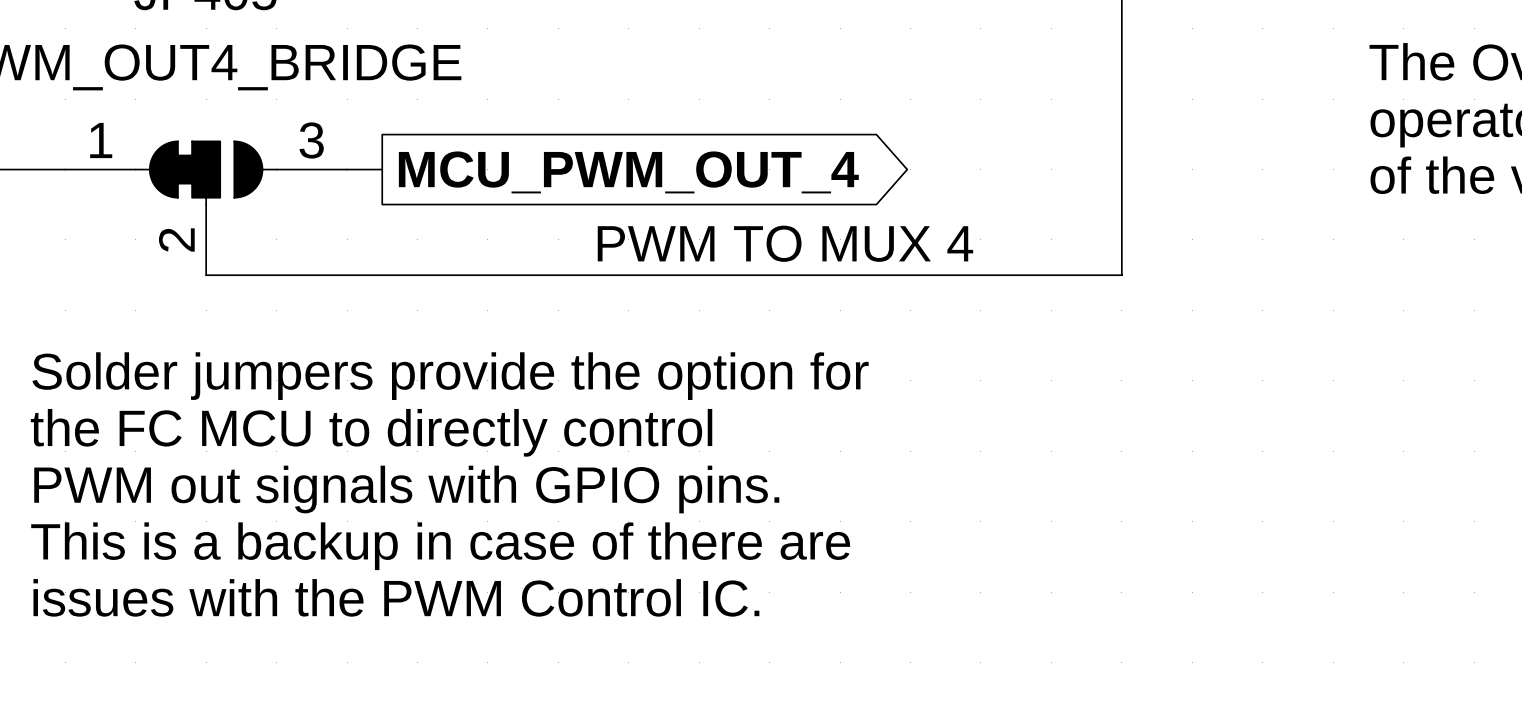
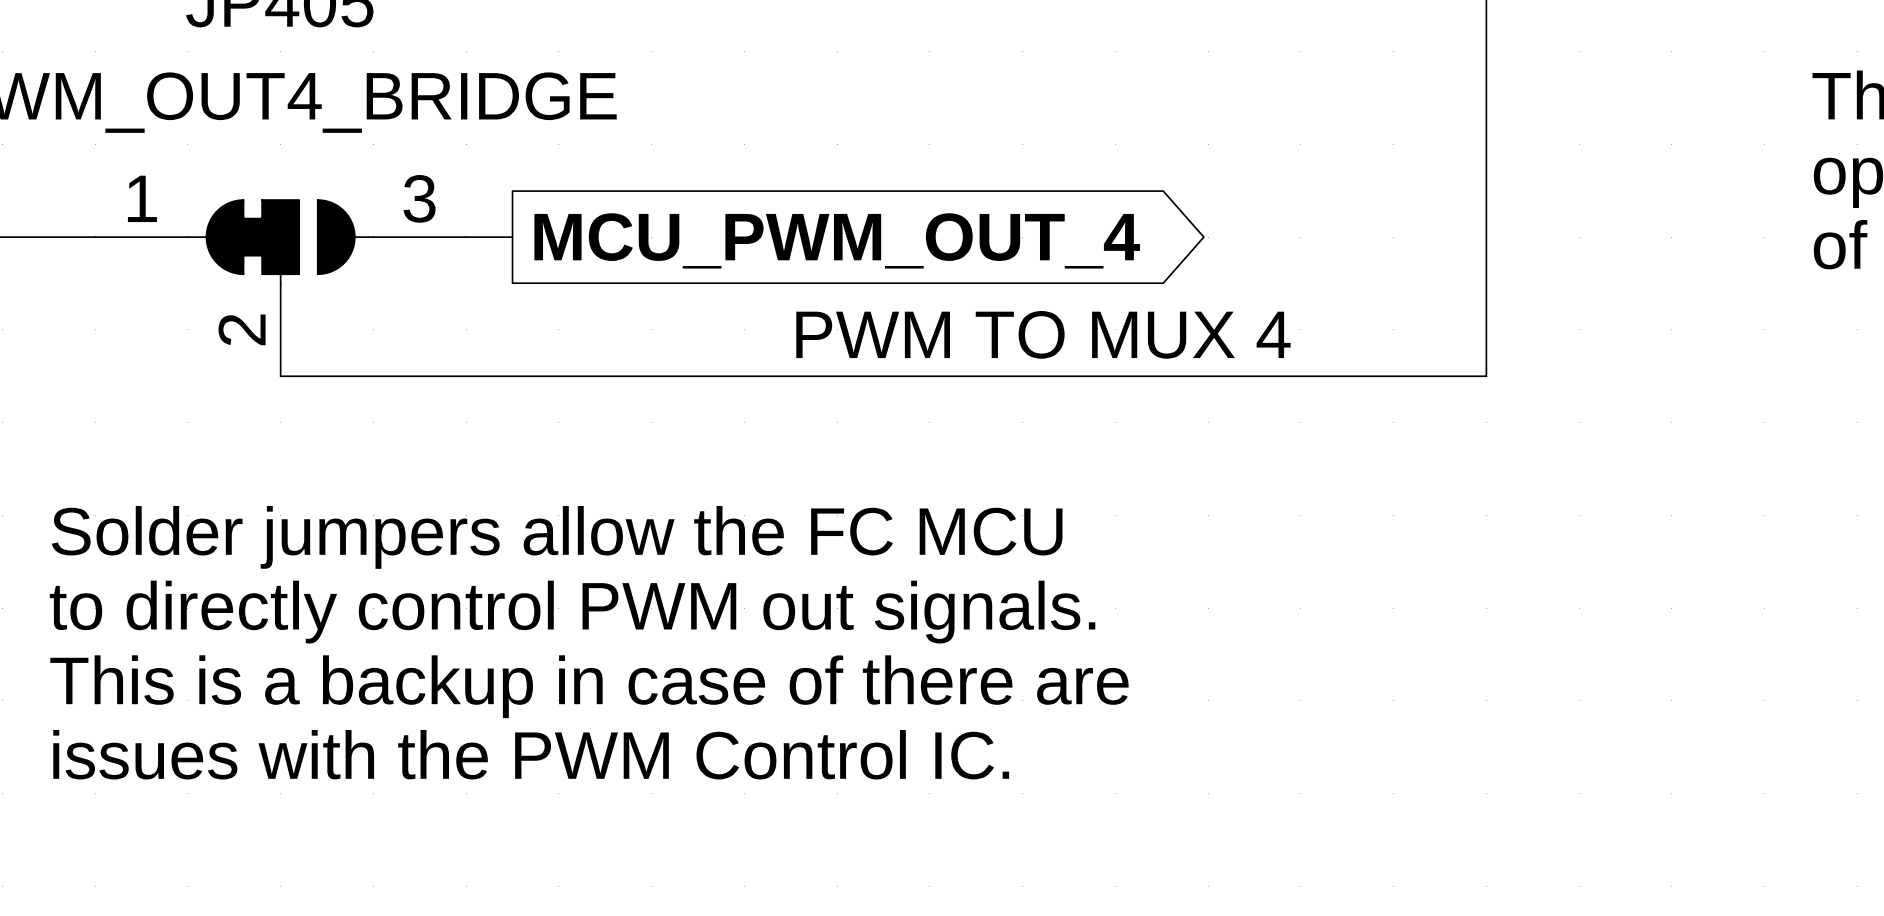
text: Solder jumpers provide the option for (450, 376) -> Solder jumpers allow the FC MCU (557, 537)
text: the FC MCU to directly control (371, 432) -> none
text: none -> to directly control PWM out signals. (572, 612)
text: PWM out signals with GPIO pins. (406, 489) -> none
text position: This is a backup in case of there are (440, 546) -> This is a backup in case of there are (589, 686)
text position: issues with the PWM Control IC. (396, 597) -> issues with the PWM Control IC. (531, 754)

